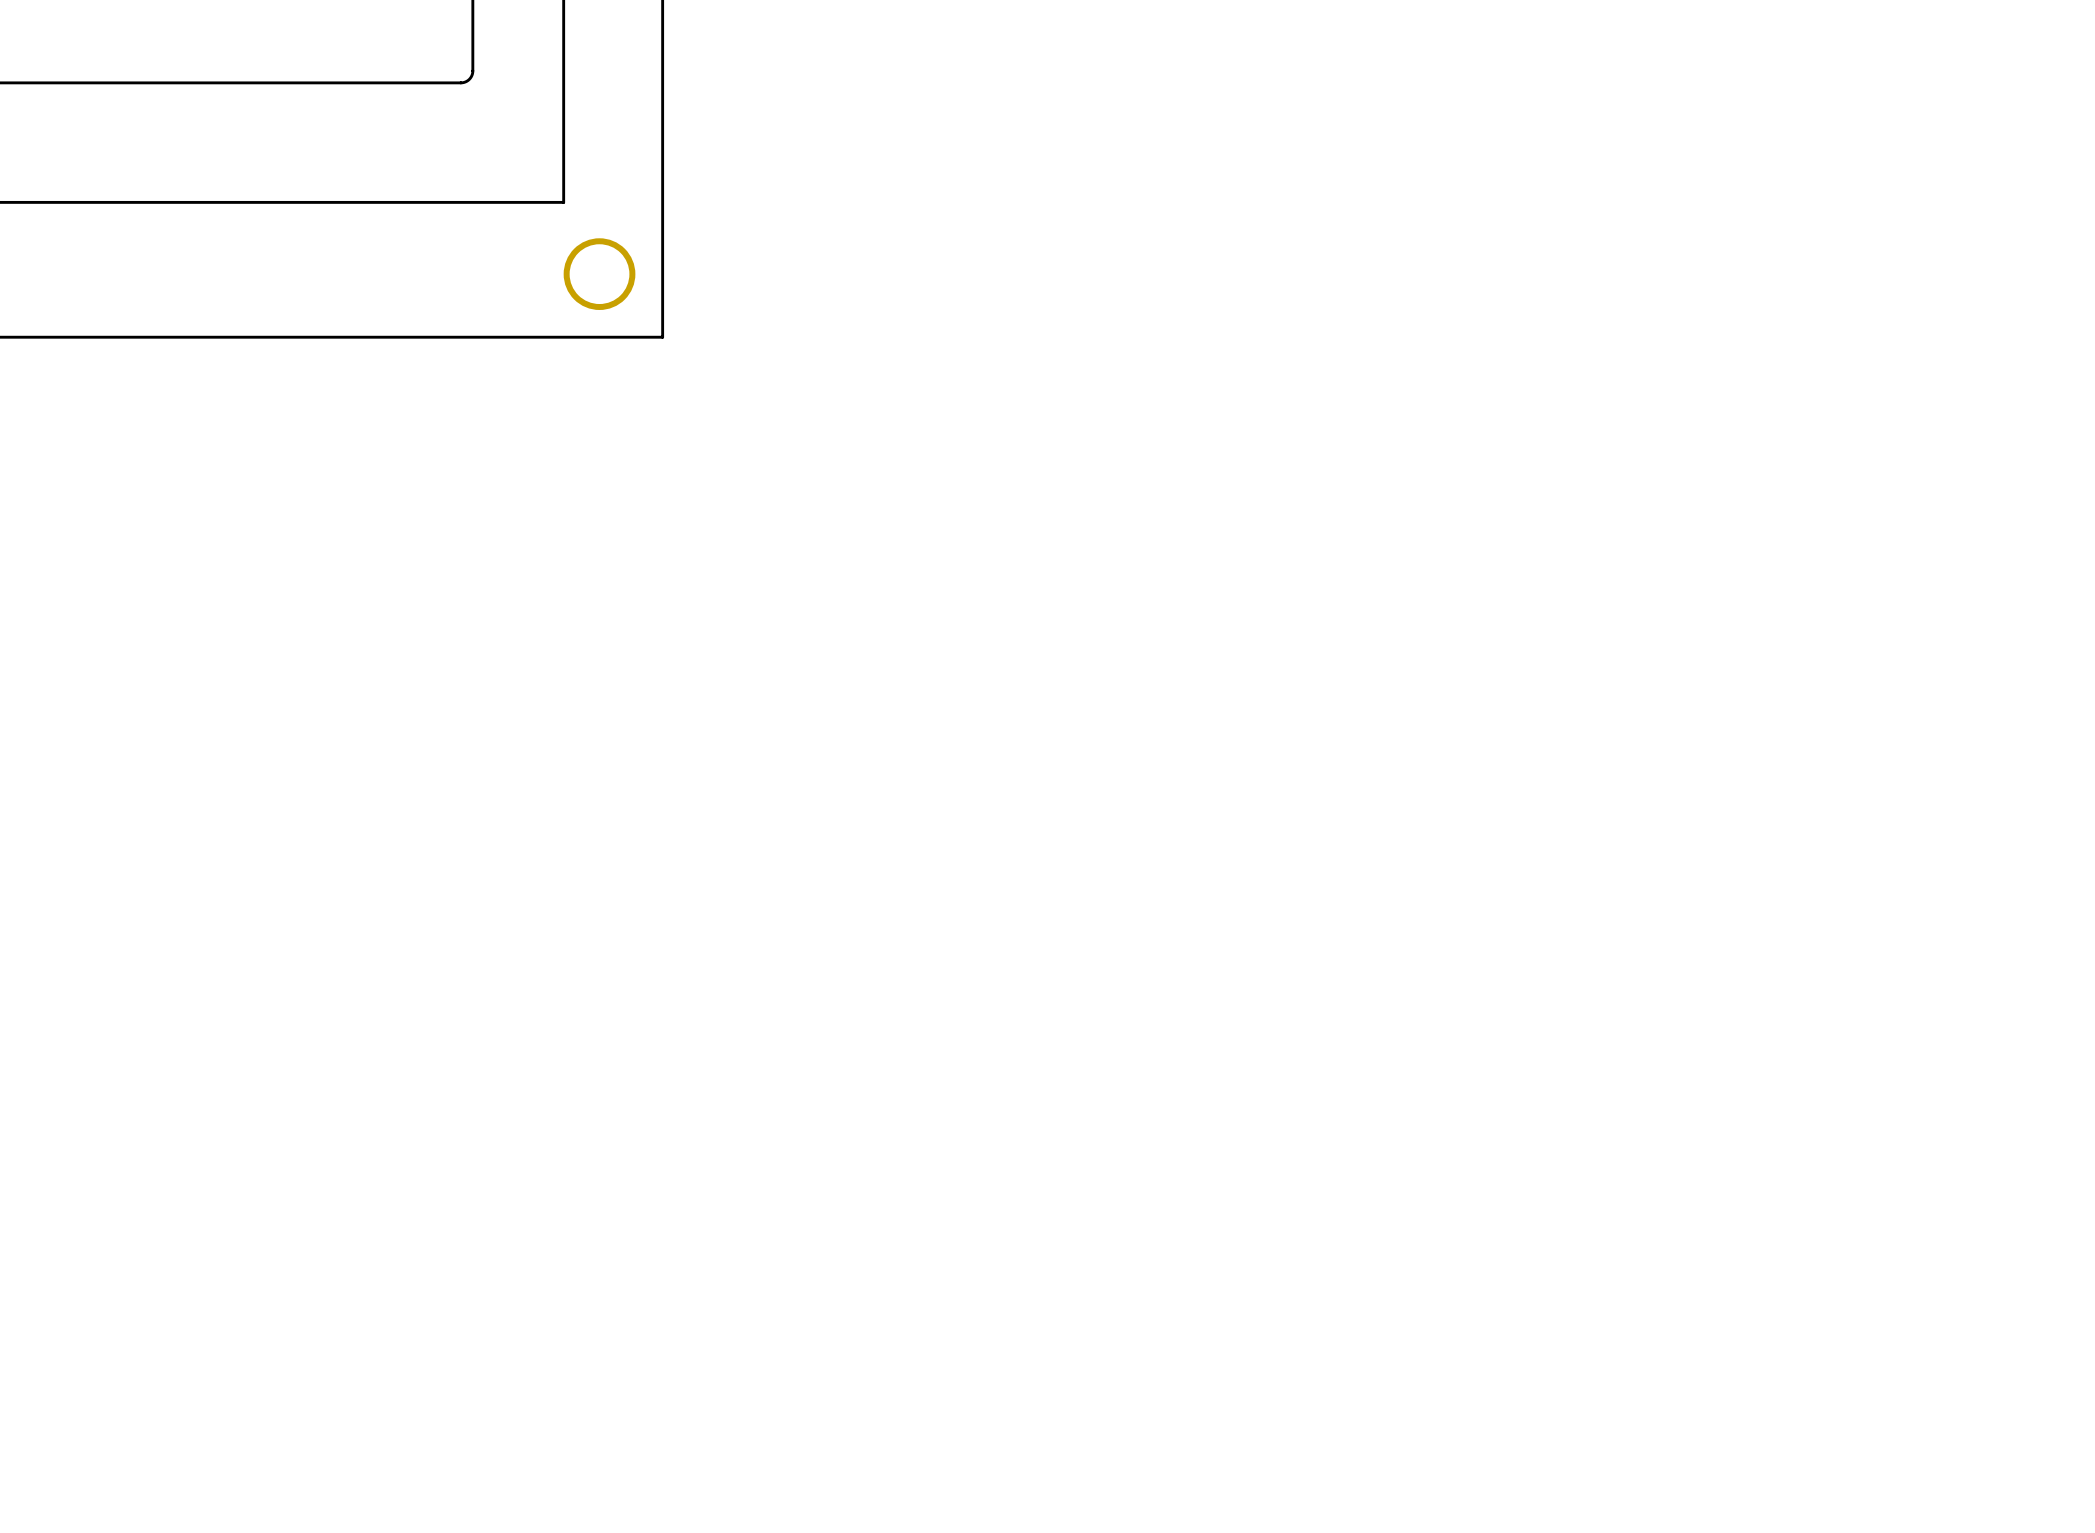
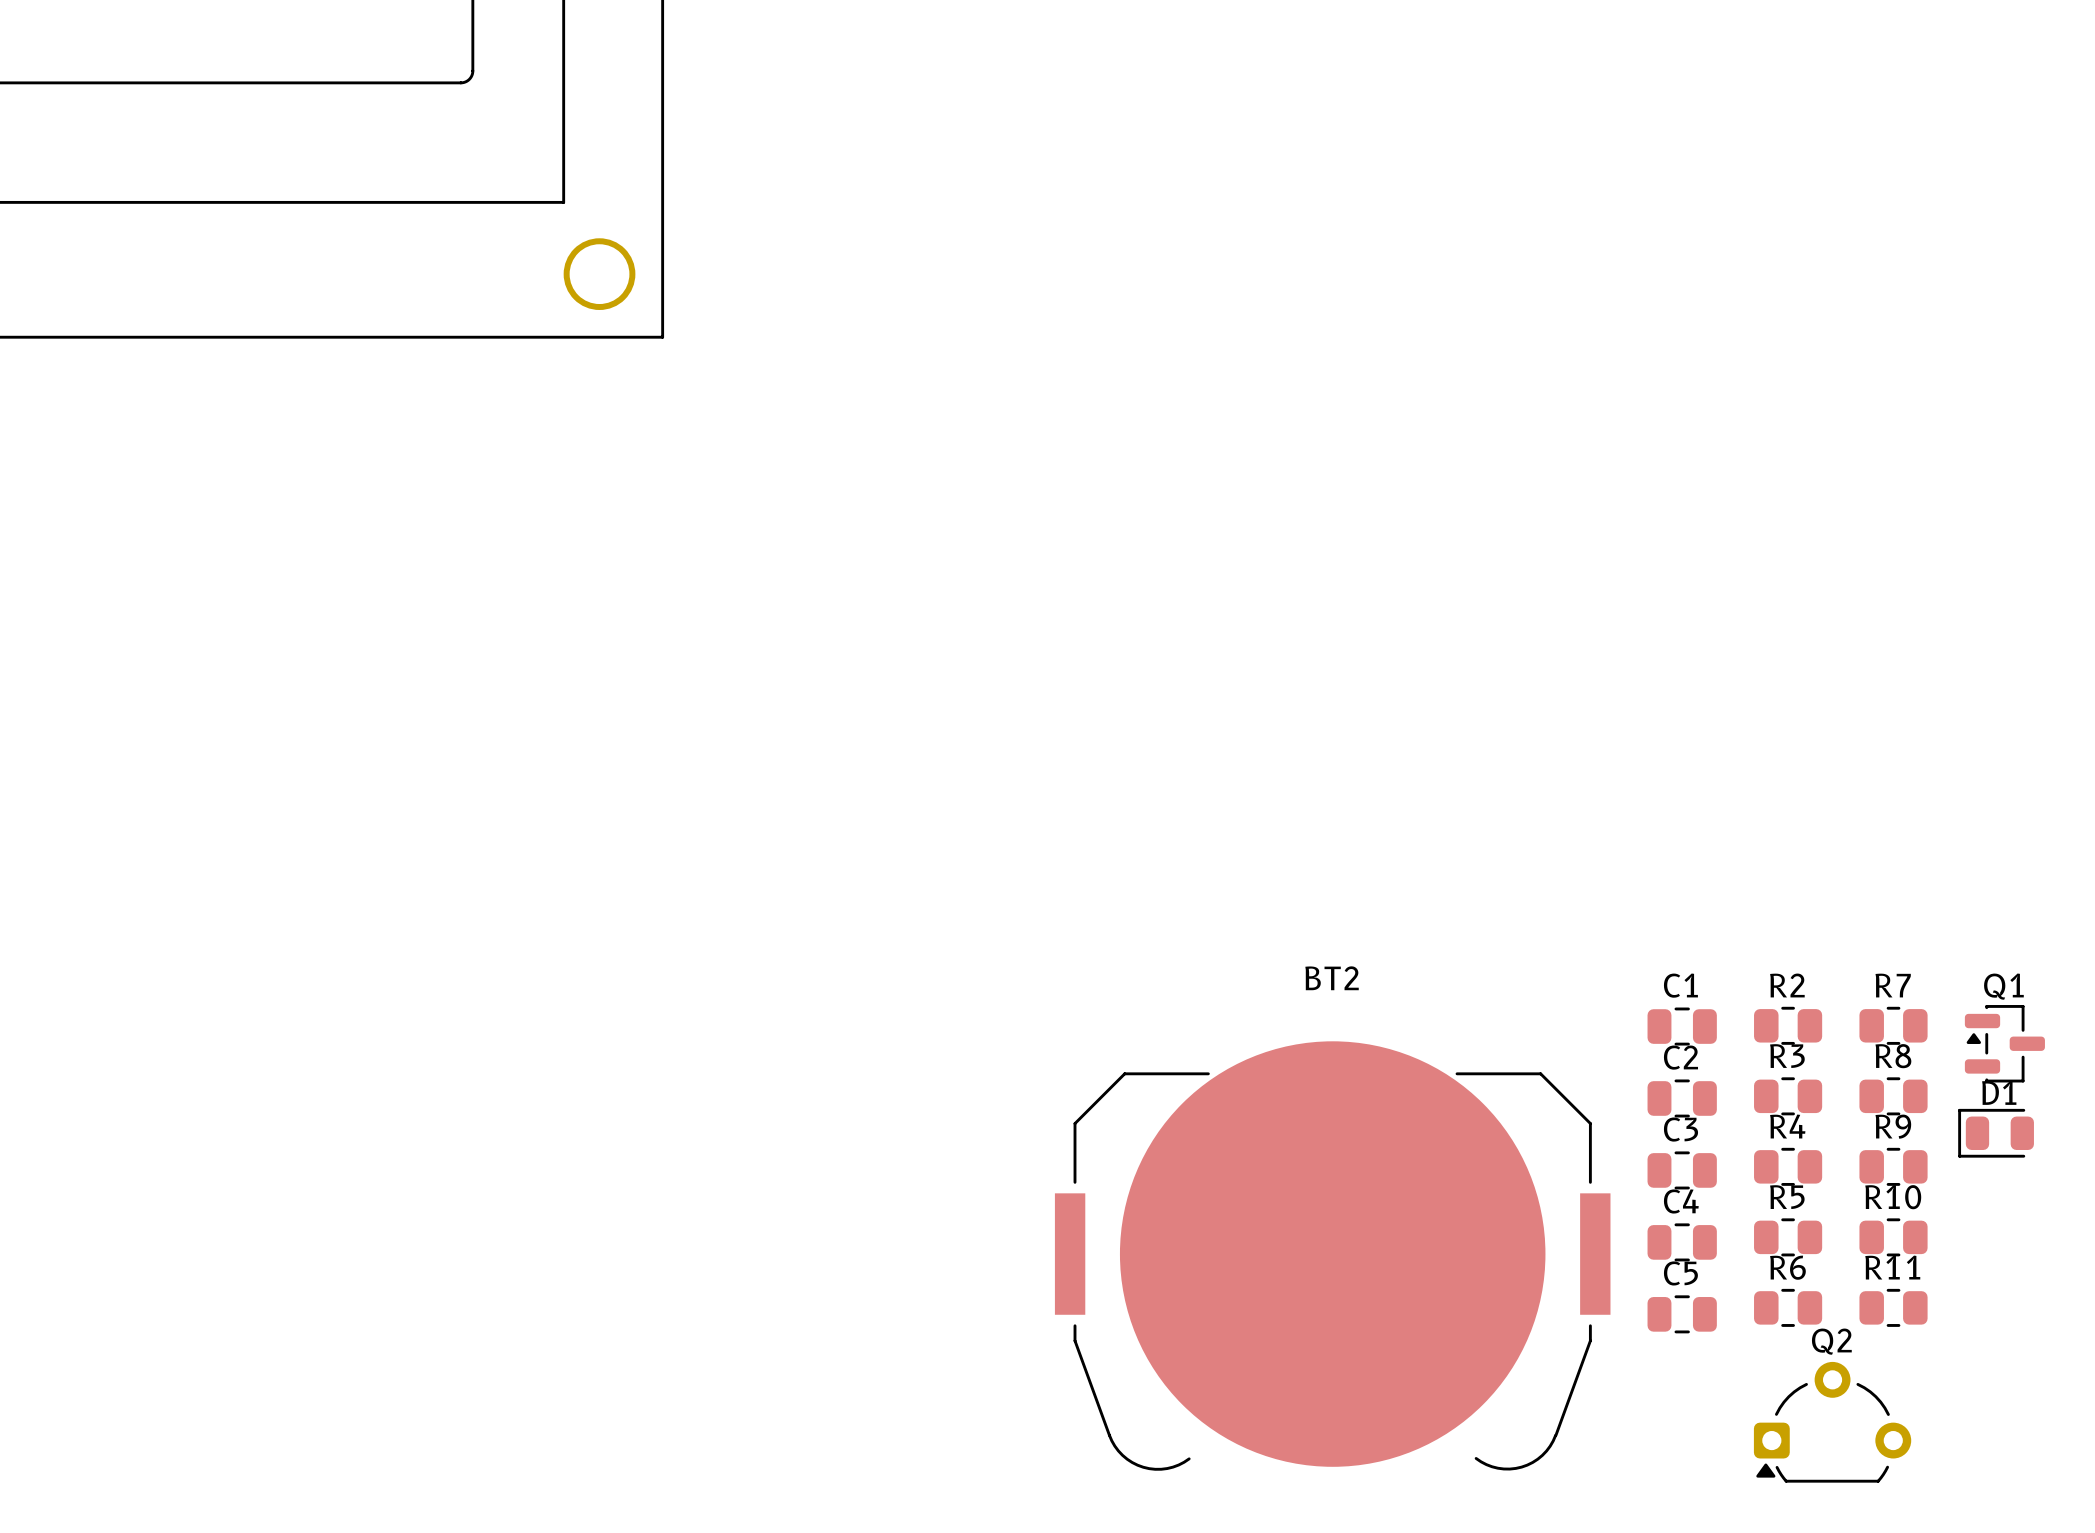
R2: none -> (1788, 1025)
R7: none -> (1893, 1025)
C1: none -> (1682, 1026)
Q1: none -> (2004, 1043)
R3: none -> (1788, 1096)
R8: none -> (1893, 1096)
C2: none -> (1682, 1098)
D1: none -> (1996, 1133)
R4: none -> (1788, 1166)
R9: none -> (1893, 1166)
C3: none -> (1682, 1170)
R5: none -> (1788, 1237)
R10: none -> (1893, 1237)
C4: none -> (1682, 1242)
BT2: none -> (1332, 1256)
R6: none -> (1788, 1307)
R11: none -> (1893, 1307)
C5: none -> (1682, 1314)
Q2: none -> (1832, 1422)

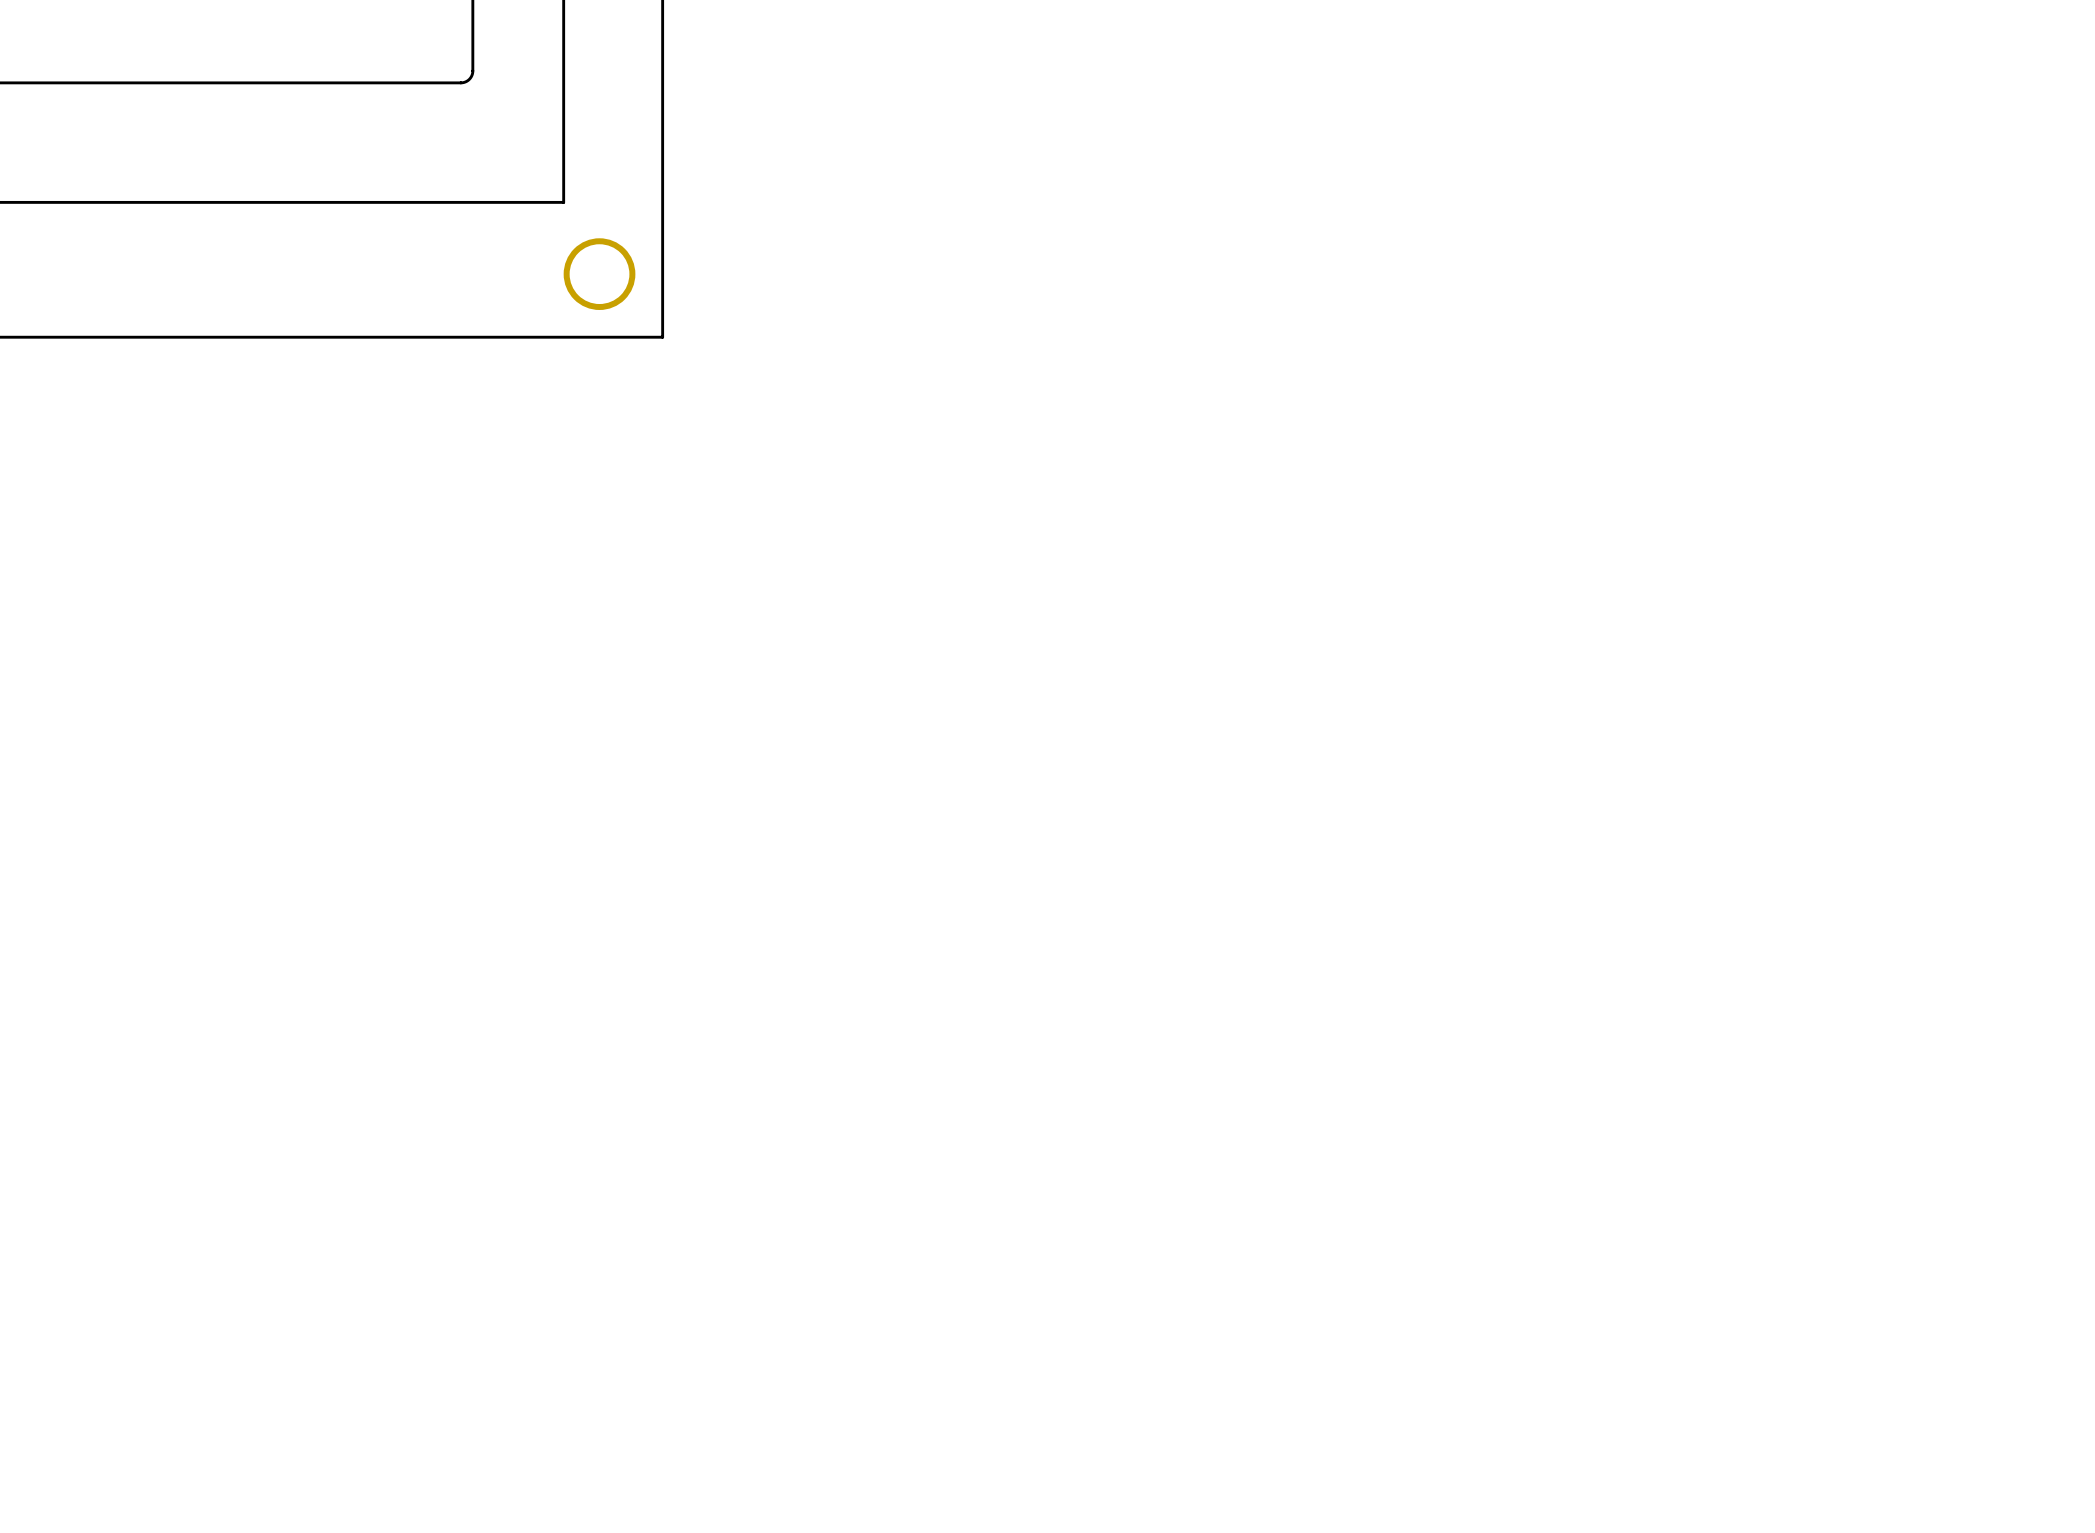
R2: (1788, 1025) -> none
R7: (1893, 1025) -> none
C1: (1682, 1026) -> none
Q1: (2004, 1043) -> none
R3: (1788, 1096) -> none
R8: (1893, 1096) -> none
C2: (1682, 1098) -> none
D1: (1996, 1133) -> none
R4: (1788, 1166) -> none
R9: (1893, 1166) -> none
C3: (1682, 1170) -> none
R5: (1788, 1237) -> none
R10: (1893, 1237) -> none
C4: (1682, 1242) -> none
BT2: (1332, 1256) -> none
R6: (1788, 1307) -> none
R11: (1893, 1307) -> none
C5: (1682, 1314) -> none
Q2: (1832, 1422) -> none

